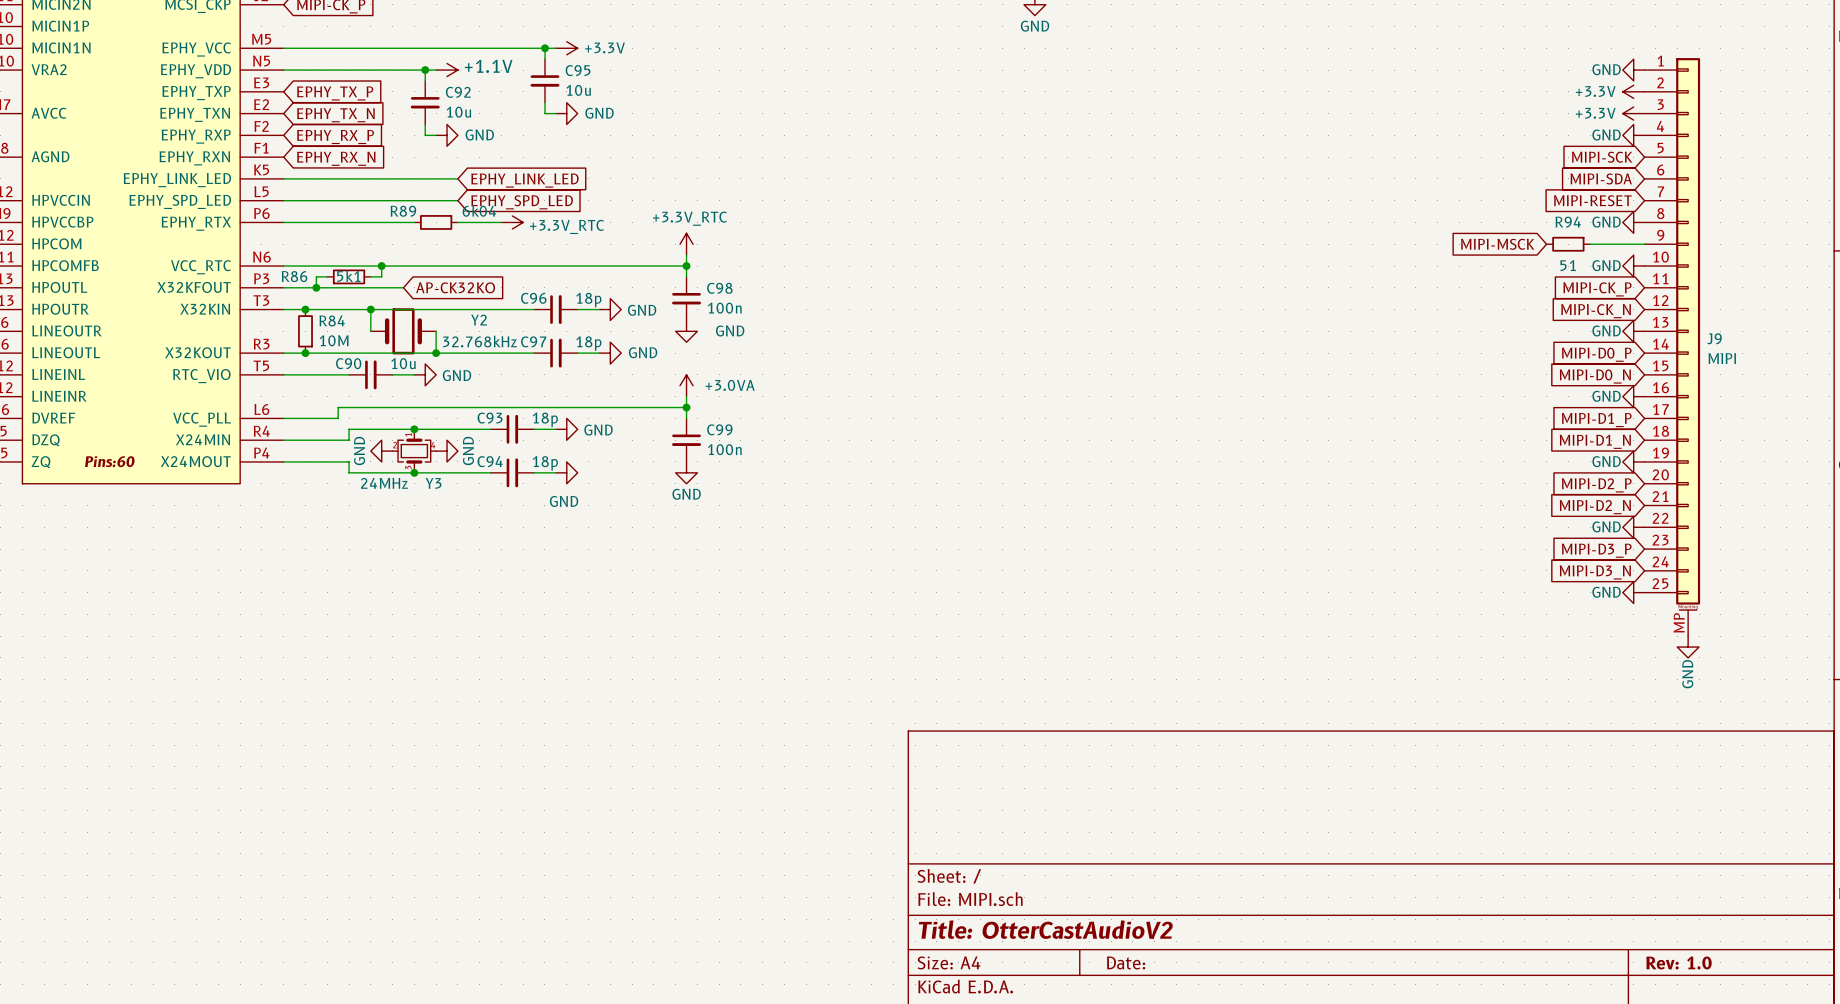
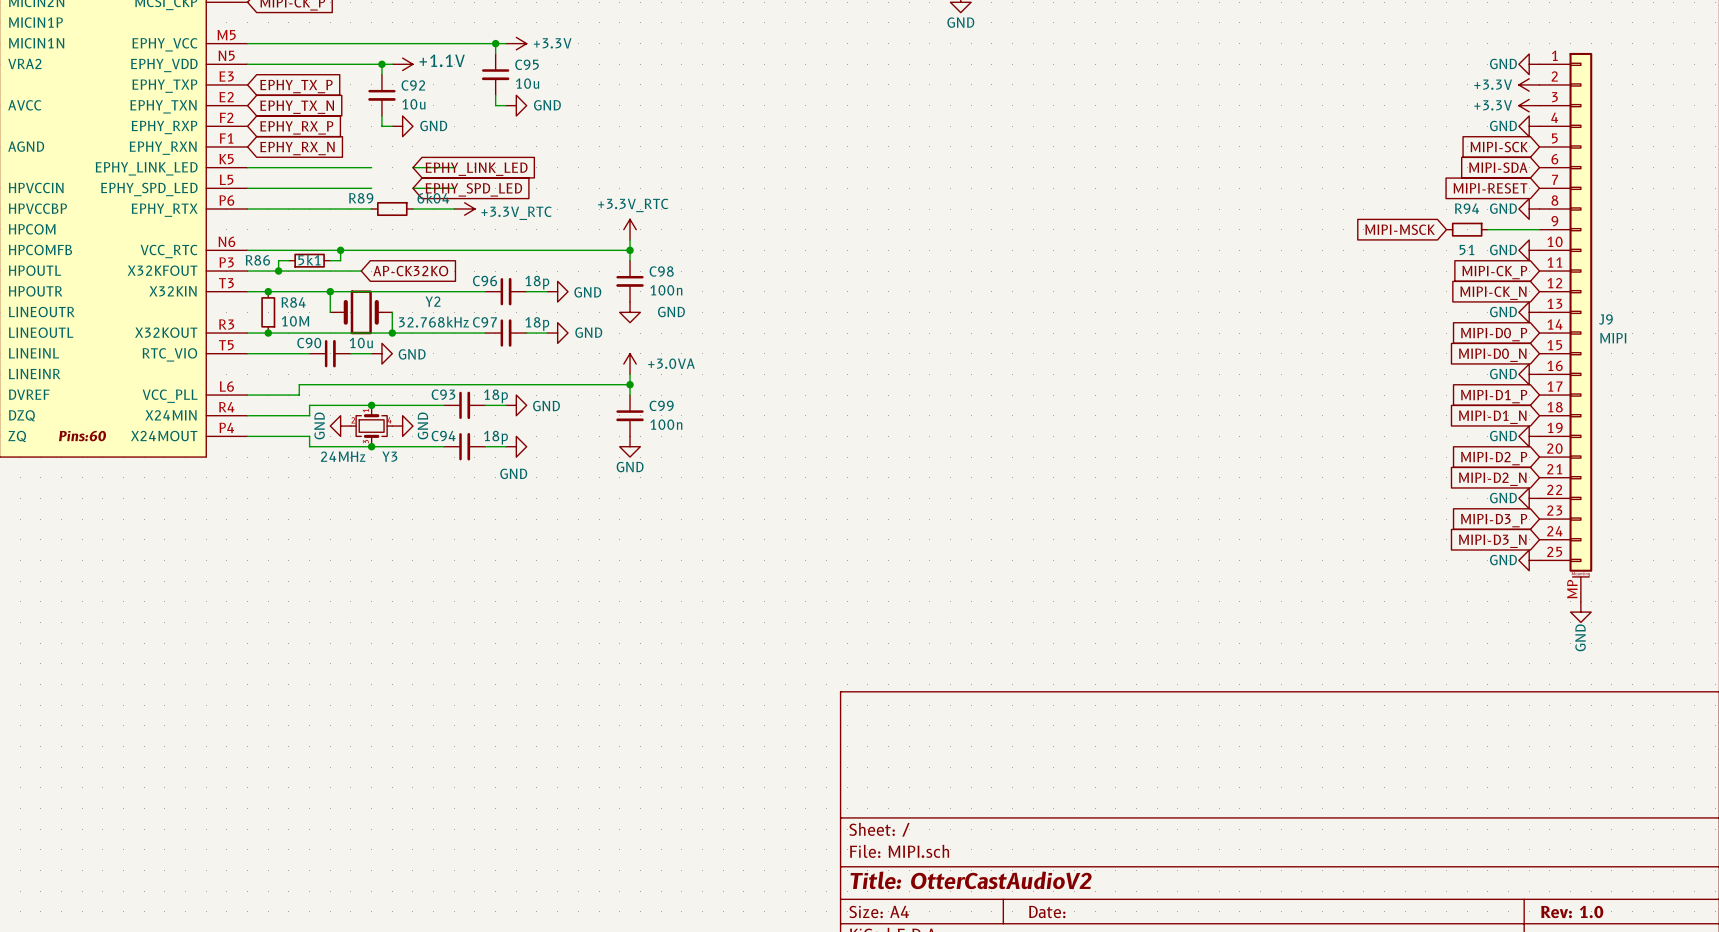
wire: (414, 178) (457, 178) -> (454, 167) (412, 167)
wire: (414, 200) (457, 200) -> (454, 188) (412, 188)

